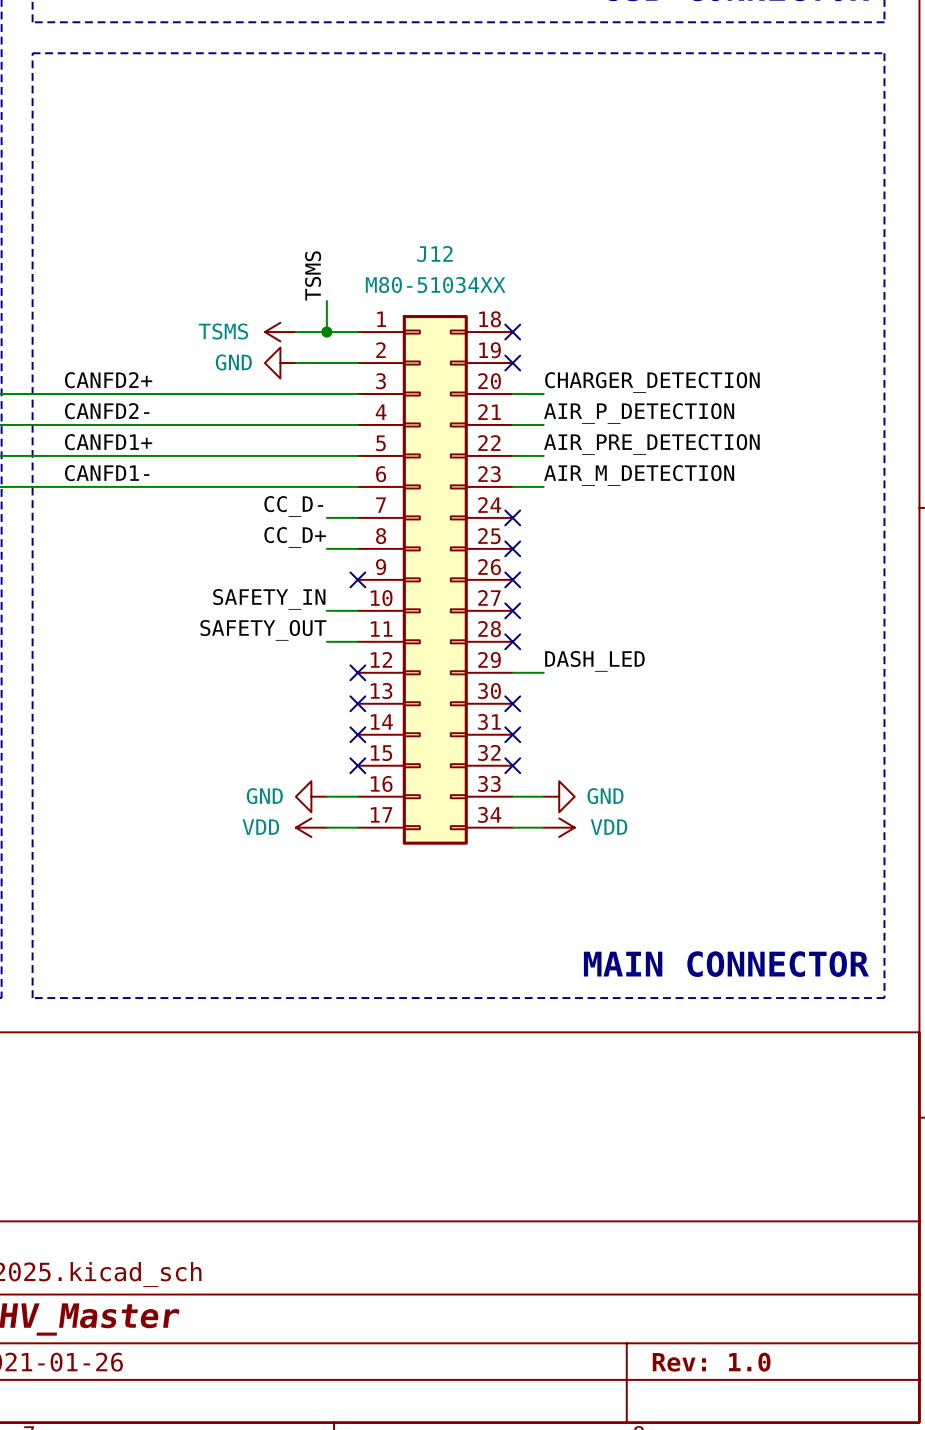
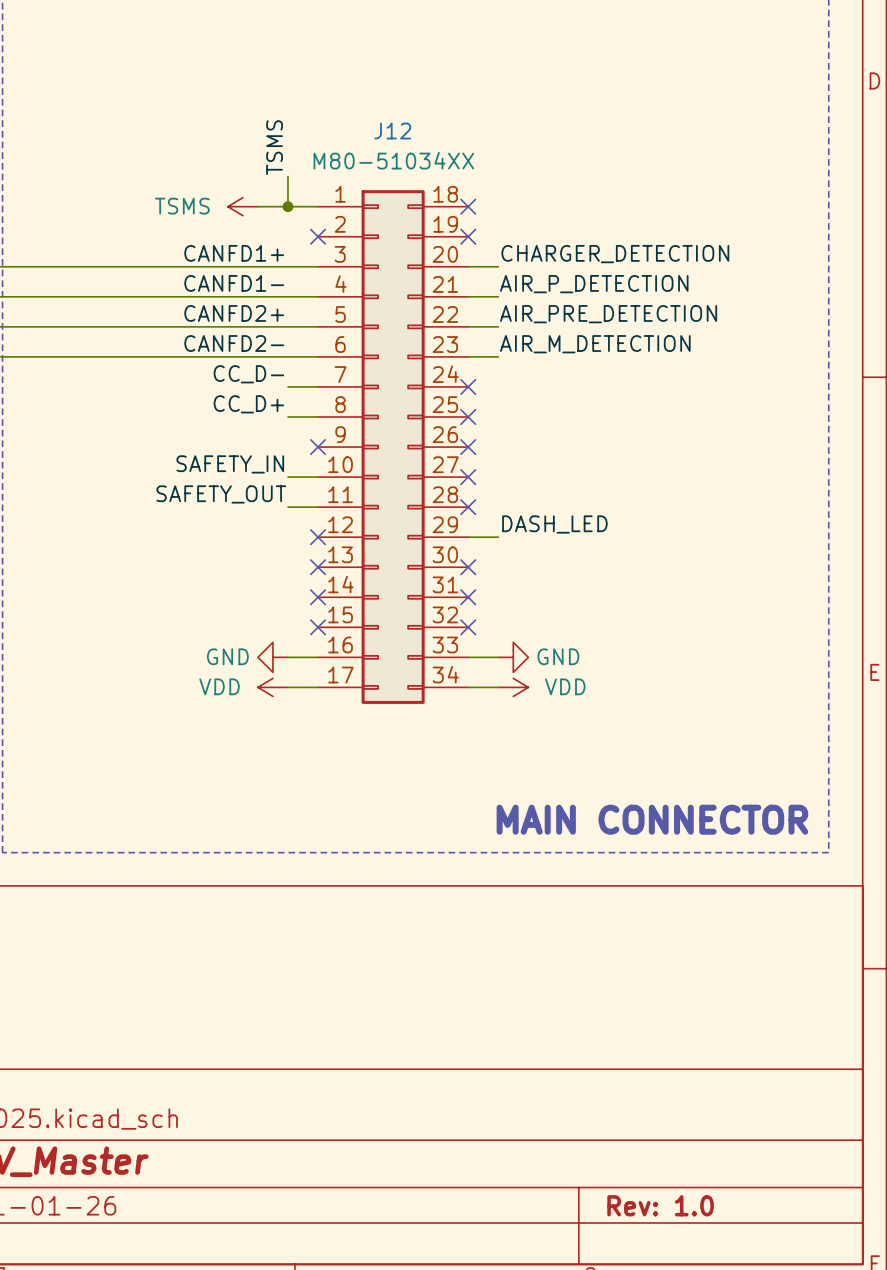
power symbol: GND (280, 363) -> none
wire: (295, 363) (357, 363) -> none
no-connect mark: none -> (318, 236)
label position: CANFD2+ (108, 380) -> CANFD2+ (234, 313)
label position: CANFD2- (107, 411) -> CANFD2- (234, 343)
label position: CANFD1+ (108, 442) -> CANFD1+ (234, 253)
label position: CANFD1- (107, 473) -> CANFD1- (234, 283)

